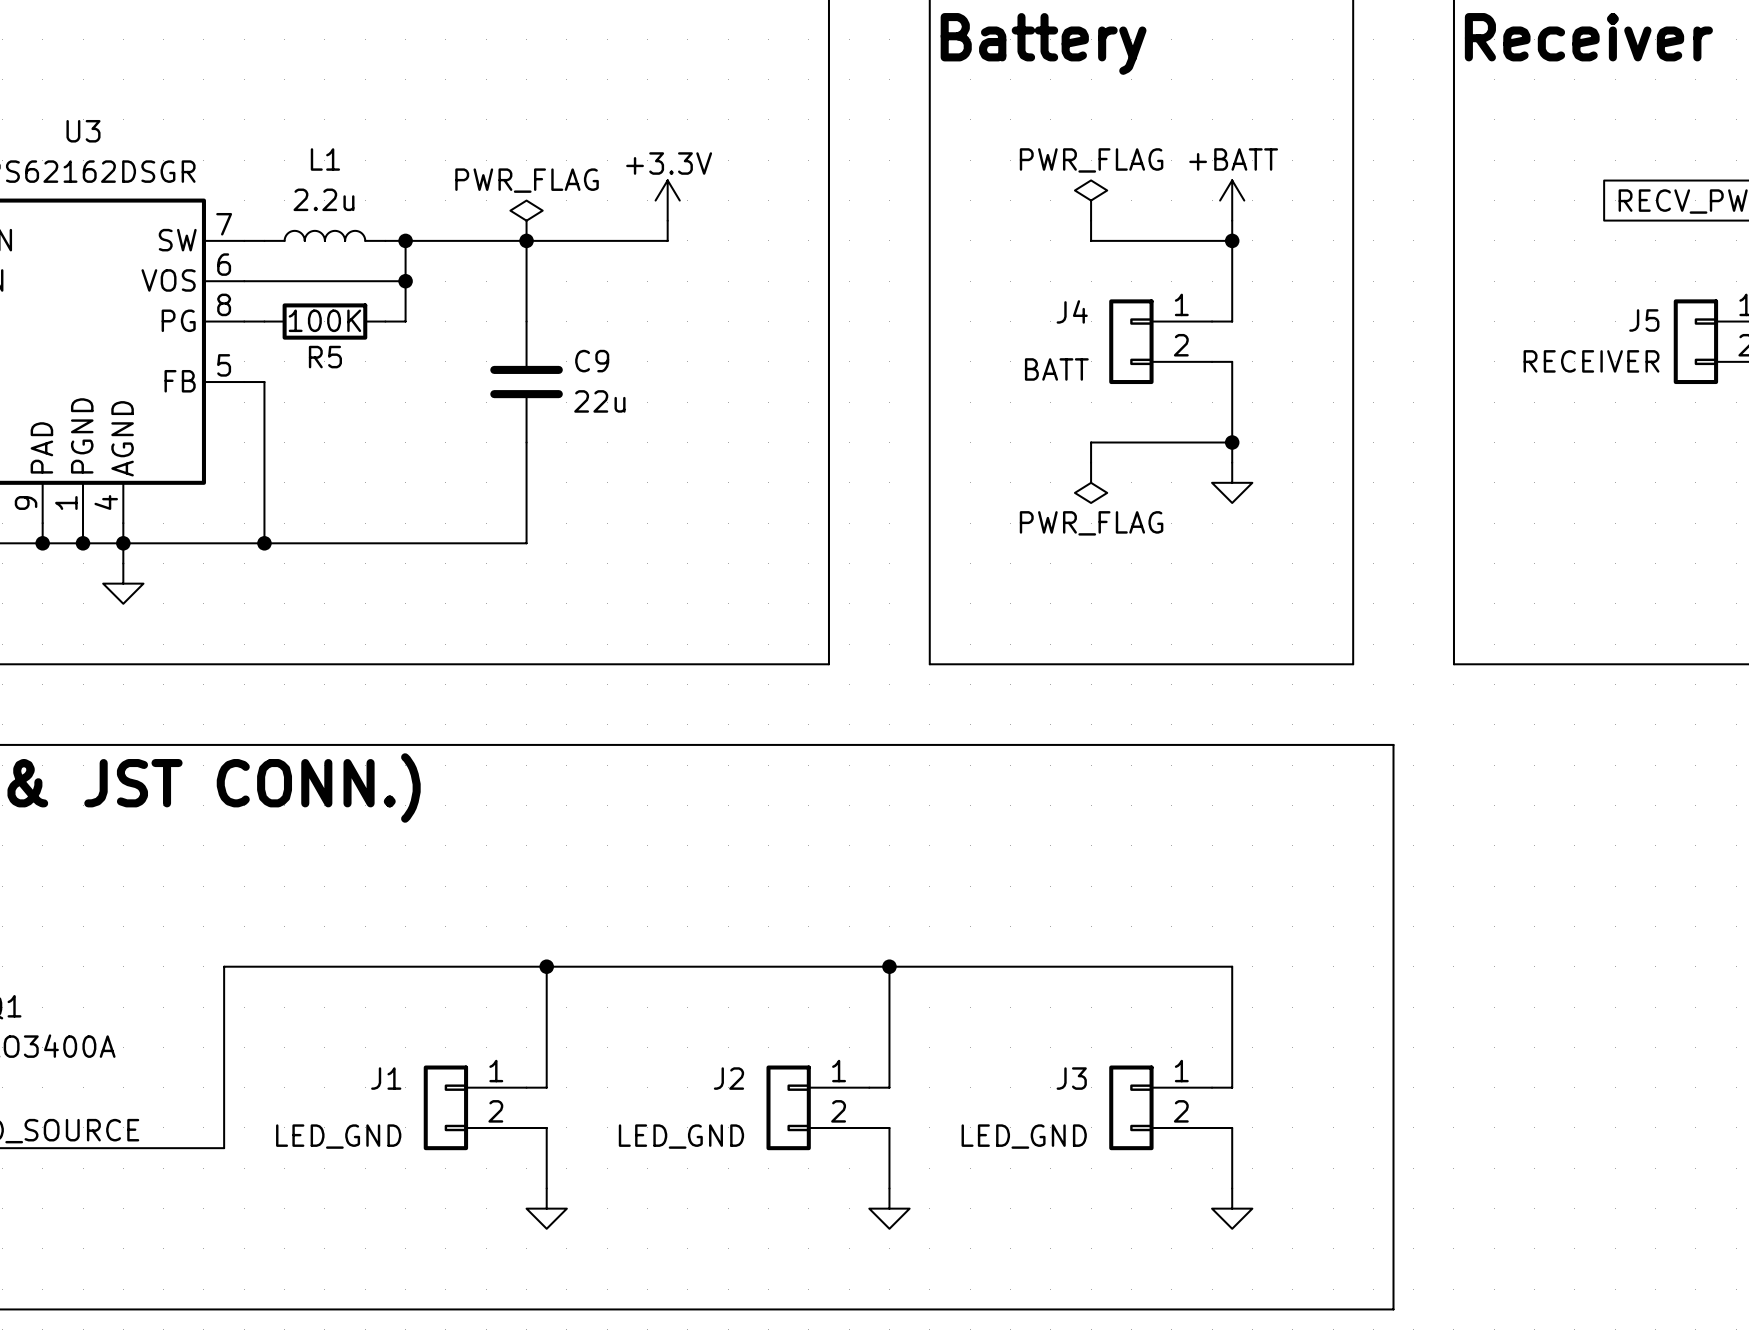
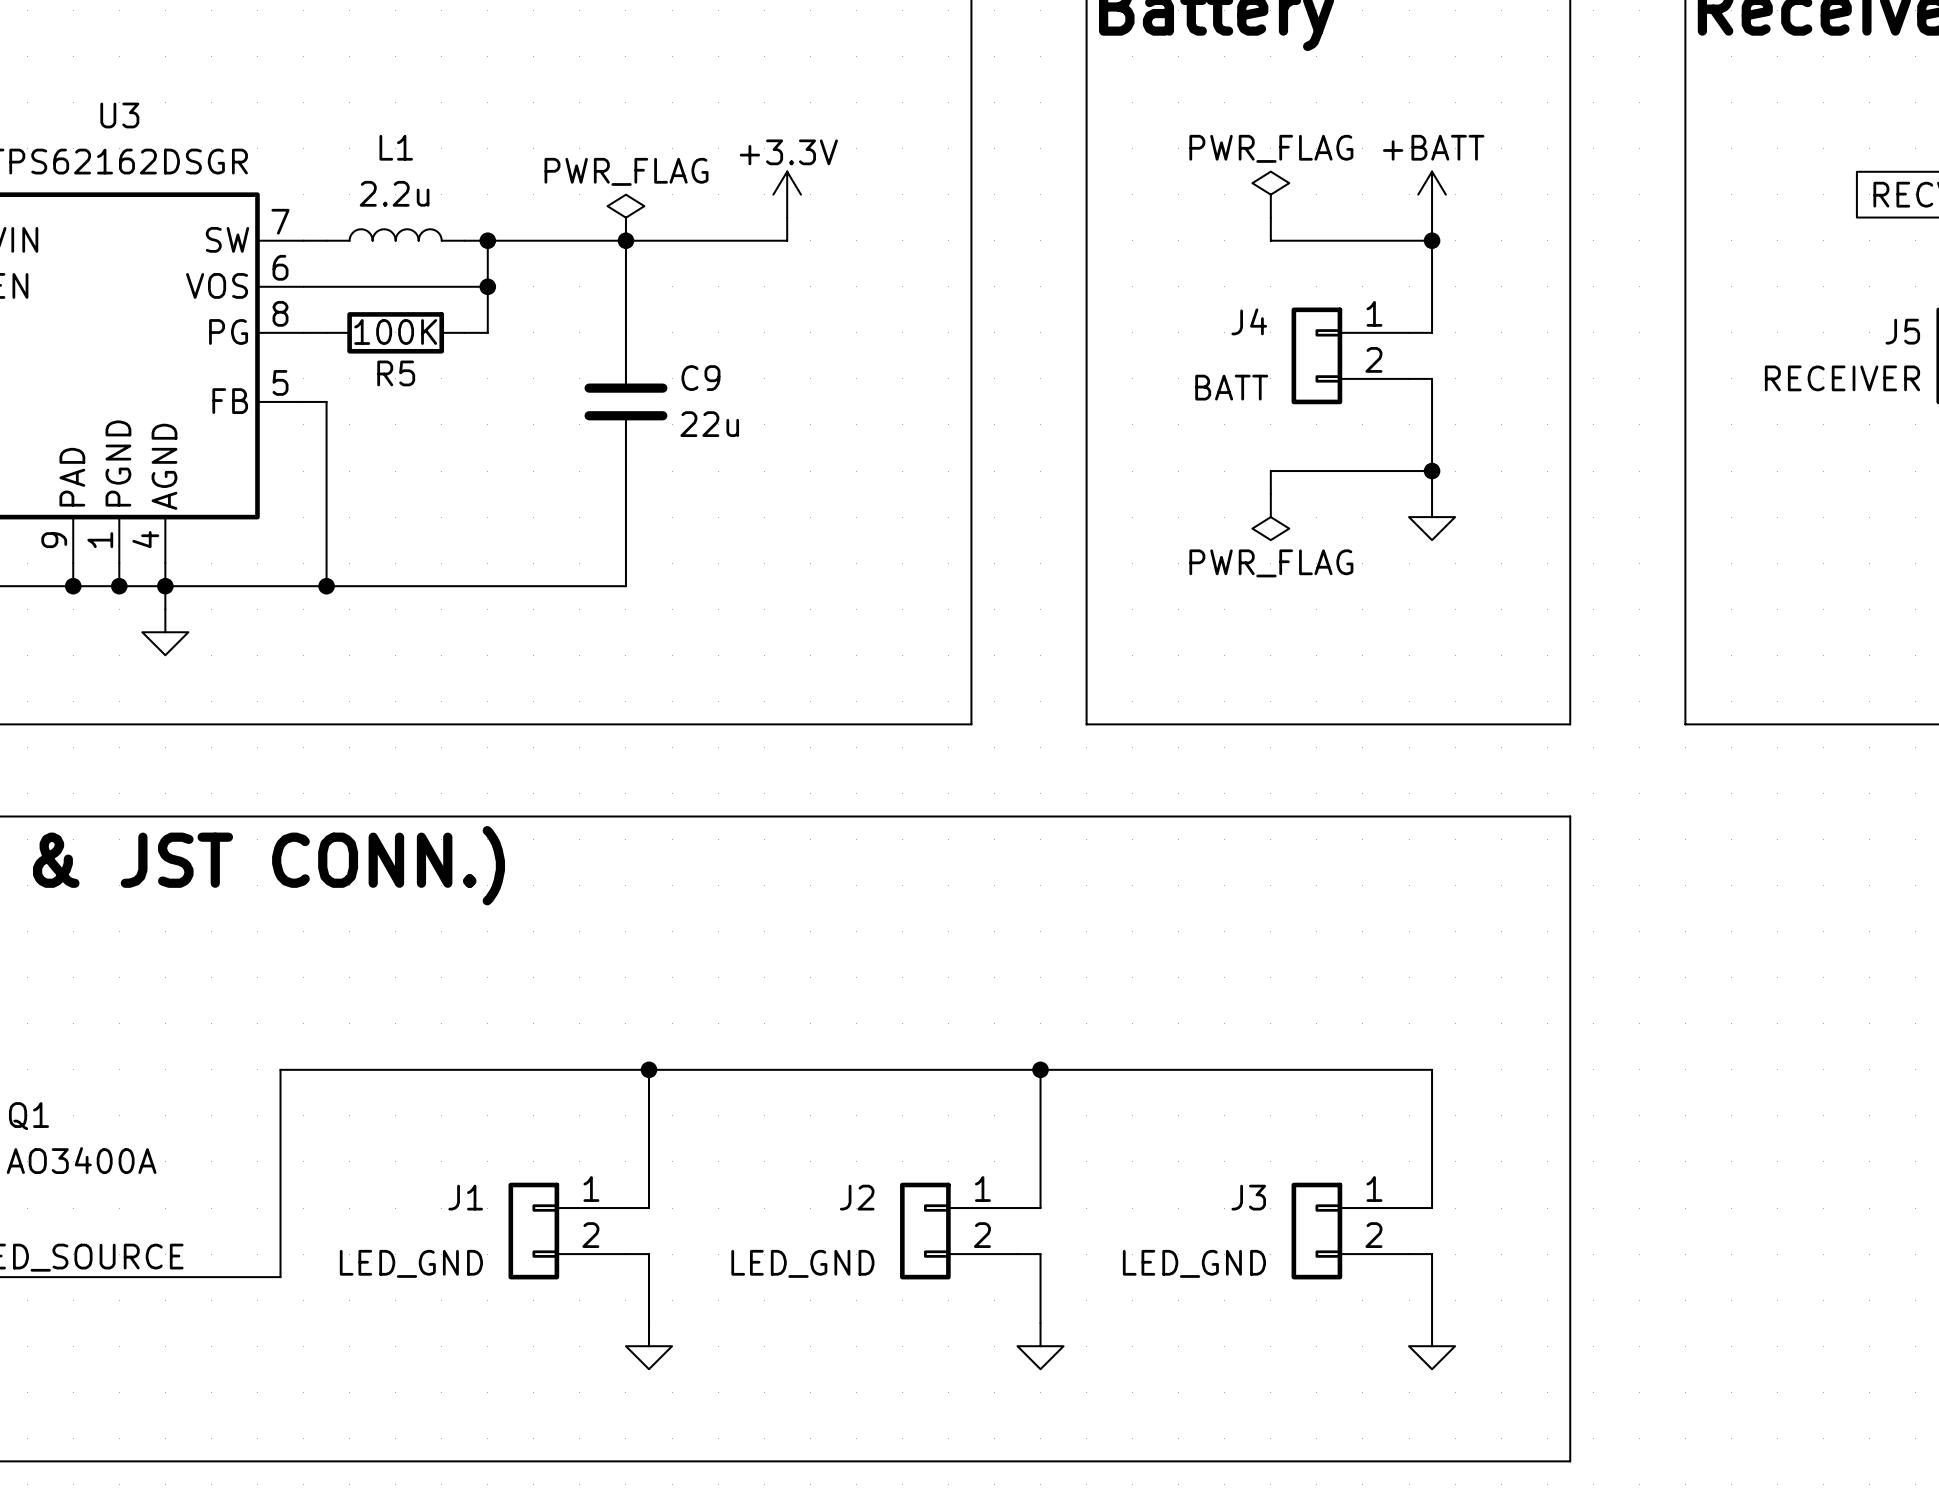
line: (1353, 744) (1393, 744) (1393, 1309) (1353, 1309) -> (1570, 816) (1570, 1461)

